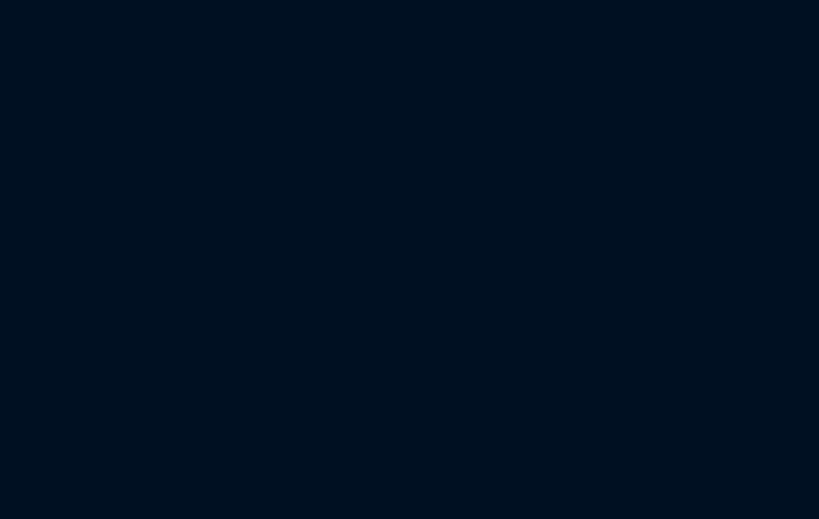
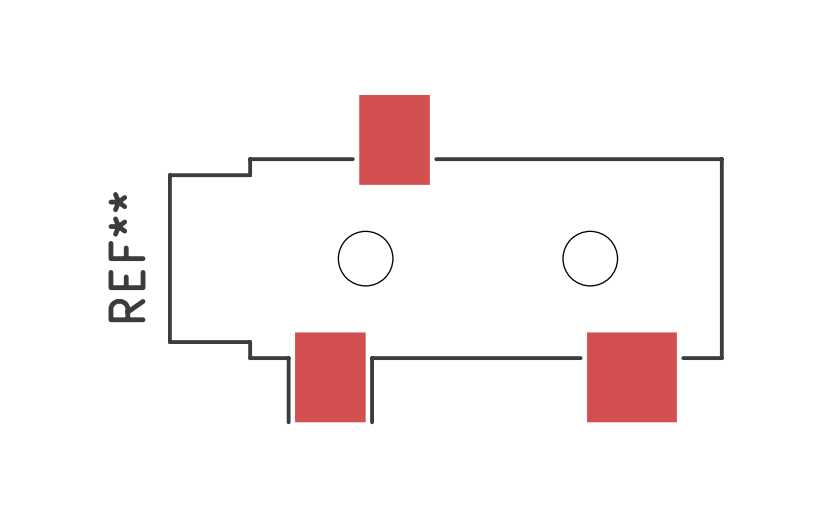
REF**: none -> (445, 259)

